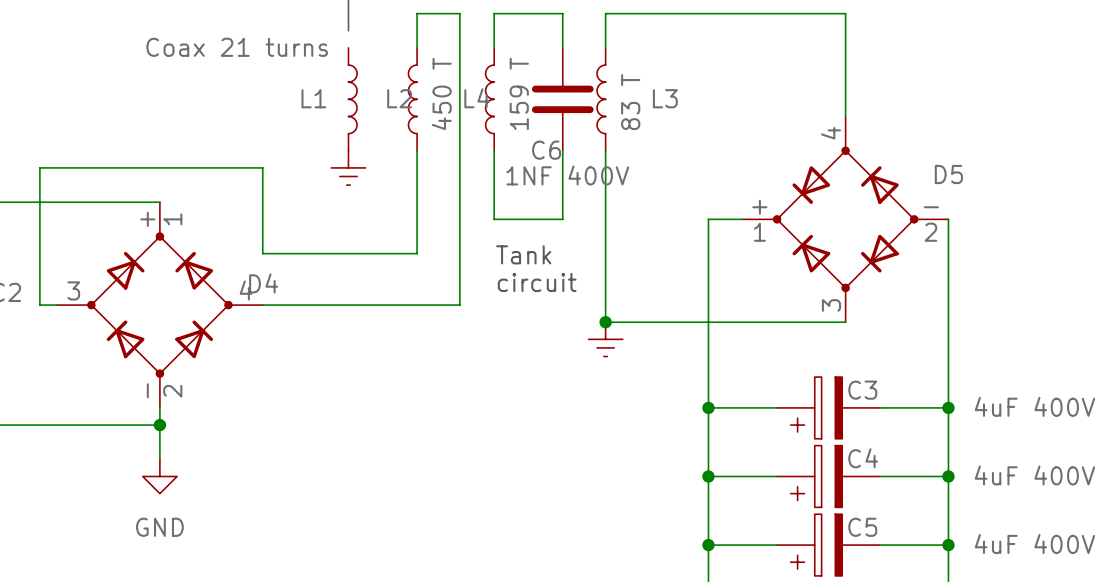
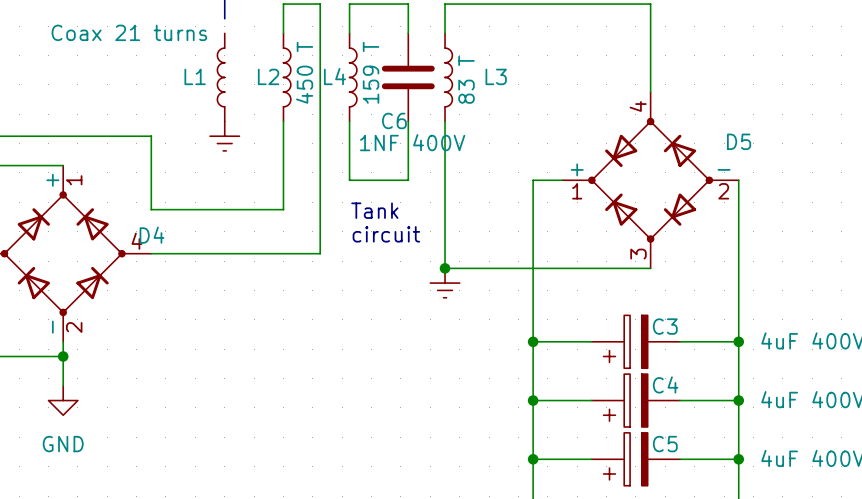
L1 rotation: 0° (352, 99) -> 180° (221, 77)
L2 rotation: 0° (412, 99) -> 180° (287, 77)
L4 rotation: 0° (489, 99) -> 180° (353, 77)
L3 rotation: 0° (601, 99) -> 180° (448, 77)

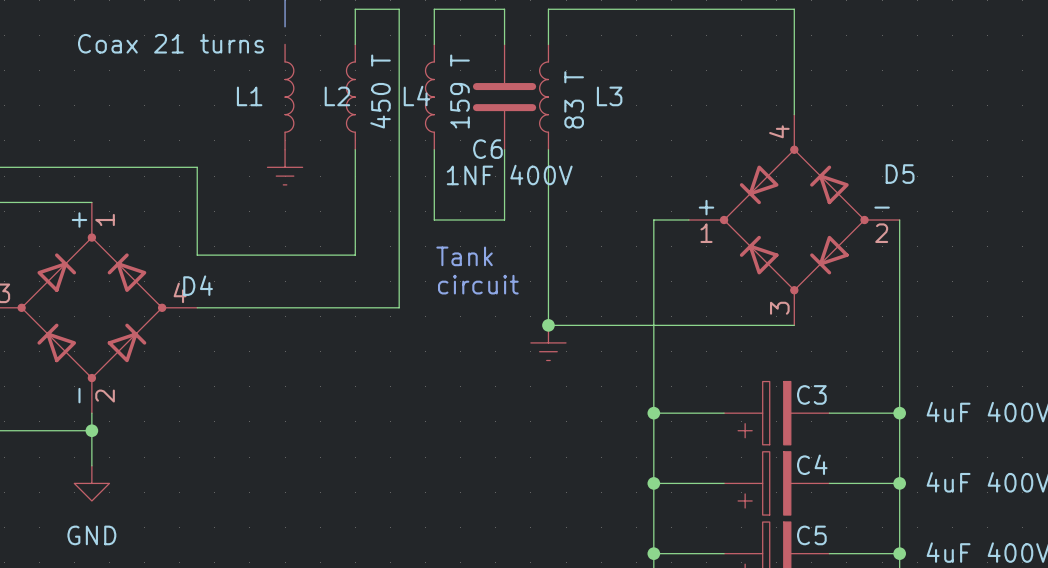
L1 rotation: 0° (221, 77) -> 180° (289, 97)
L2 rotation: 0° (287, 77) -> 180° (350, 97)
L4 rotation: 0° (353, 77) -> 180° (429, 97)
L3 rotation: 0° (448, 77) -> 180° (544, 97)

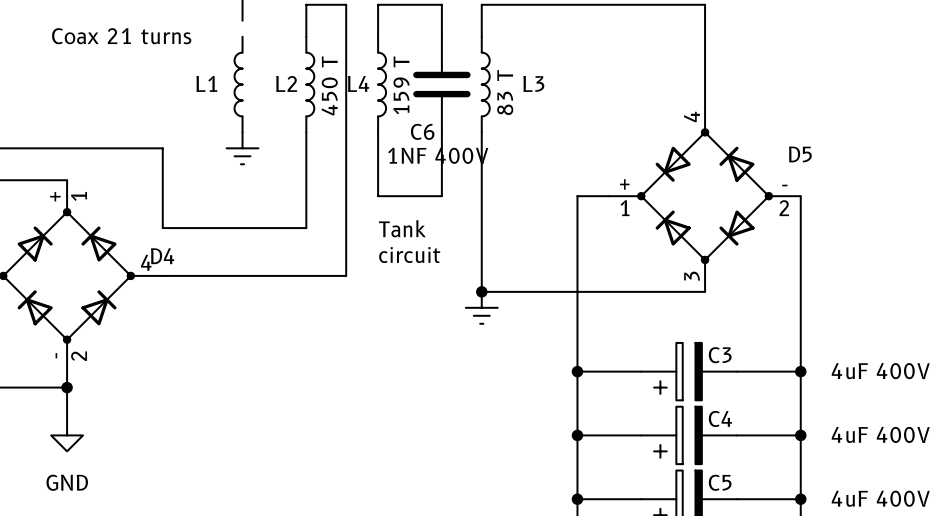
L1 rotation: 0° (289, 97) -> 180° (238, 84)
L2 rotation: 0° (350, 97) -> 180° (310, 84)
L4 rotation: 0° (429, 97) -> 180° (382, 84)
L3 rotation: 0° (544, 97) -> 180° (485, 84)

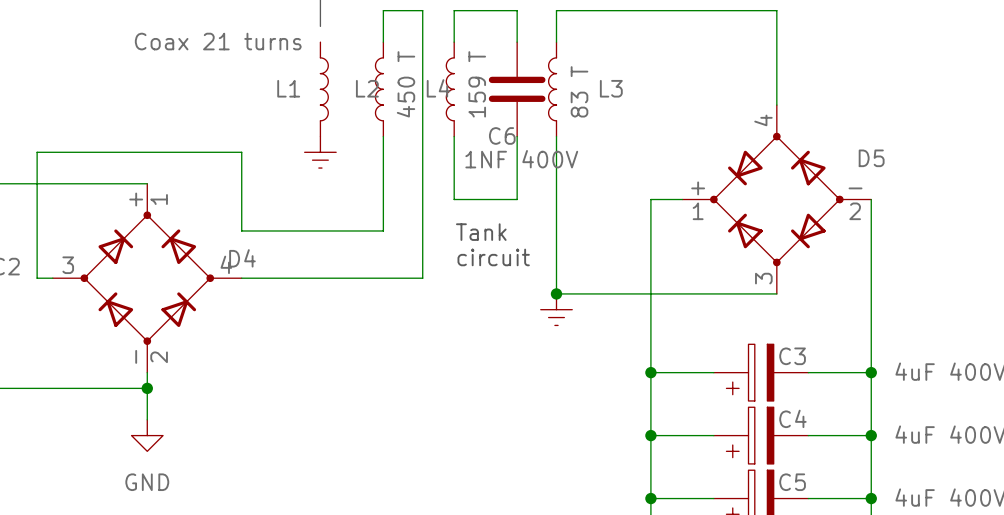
L1 rotation: 0° (238, 84) -> 180° (324, 89)
L2 rotation: 0° (310, 84) -> 180° (379, 89)
L4 rotation: 0° (382, 84) -> 180° (450, 89)
L3 rotation: 0° (485, 84) -> 180° (552, 89)

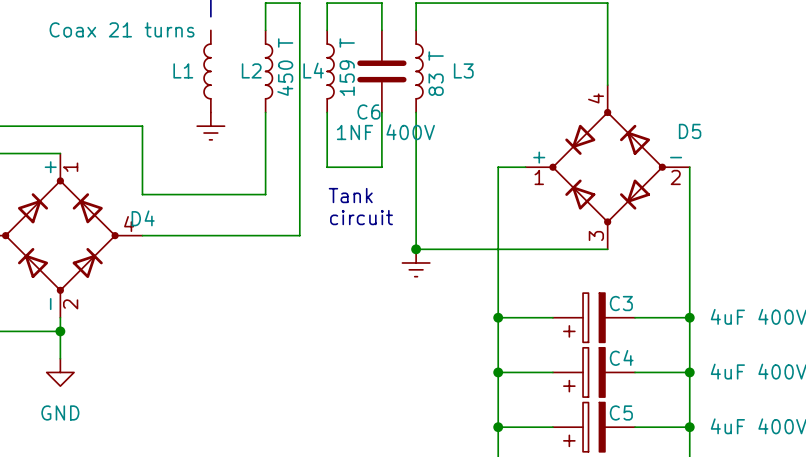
L1 rotation: 0° (324, 89) -> 180° (207, 71)
L2 rotation: 0° (379, 89) -> 180° (269, 71)
L4 rotation: 0° (450, 89) -> 180° (330, 71)
L3 rotation: 0° (552, 89) -> 180° (419, 71)

